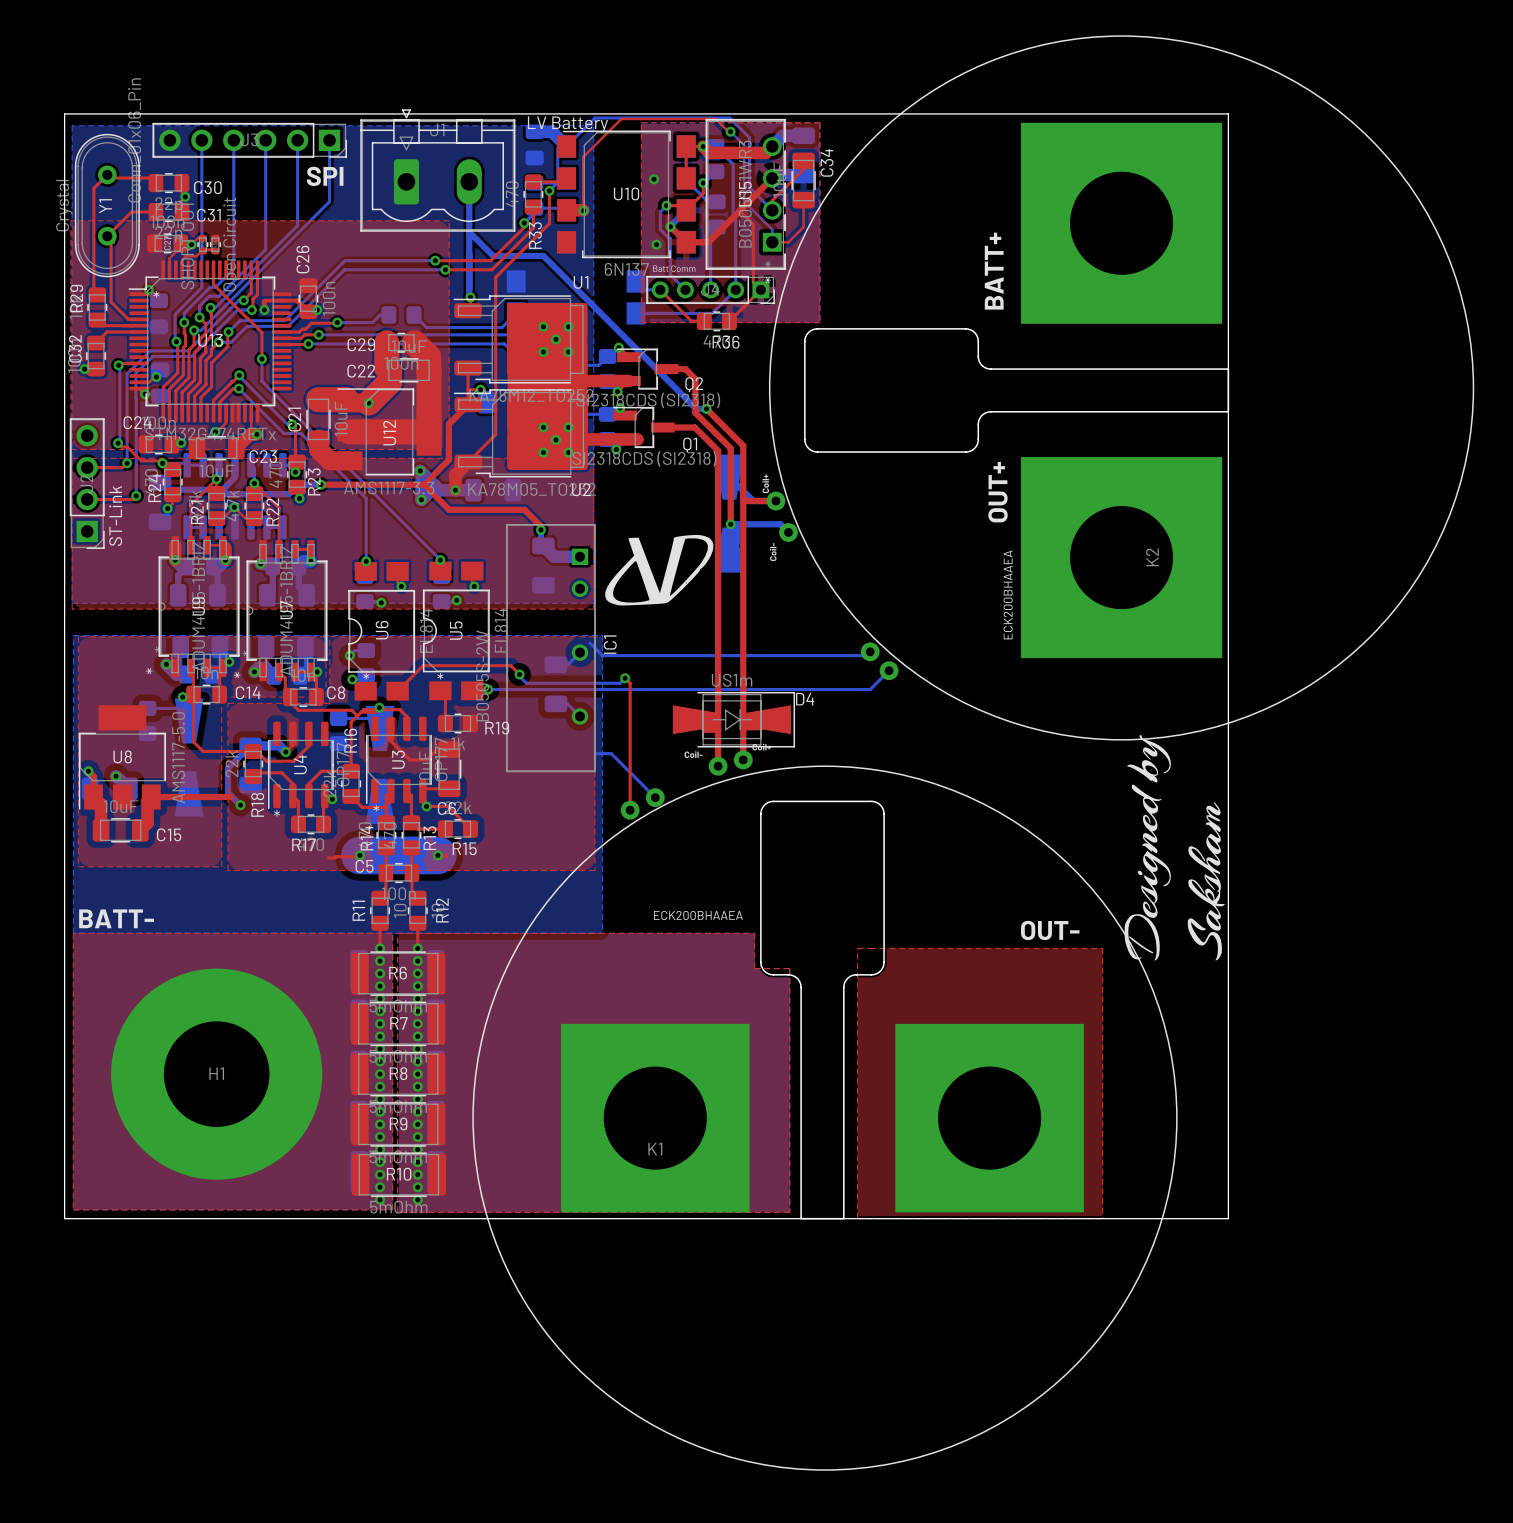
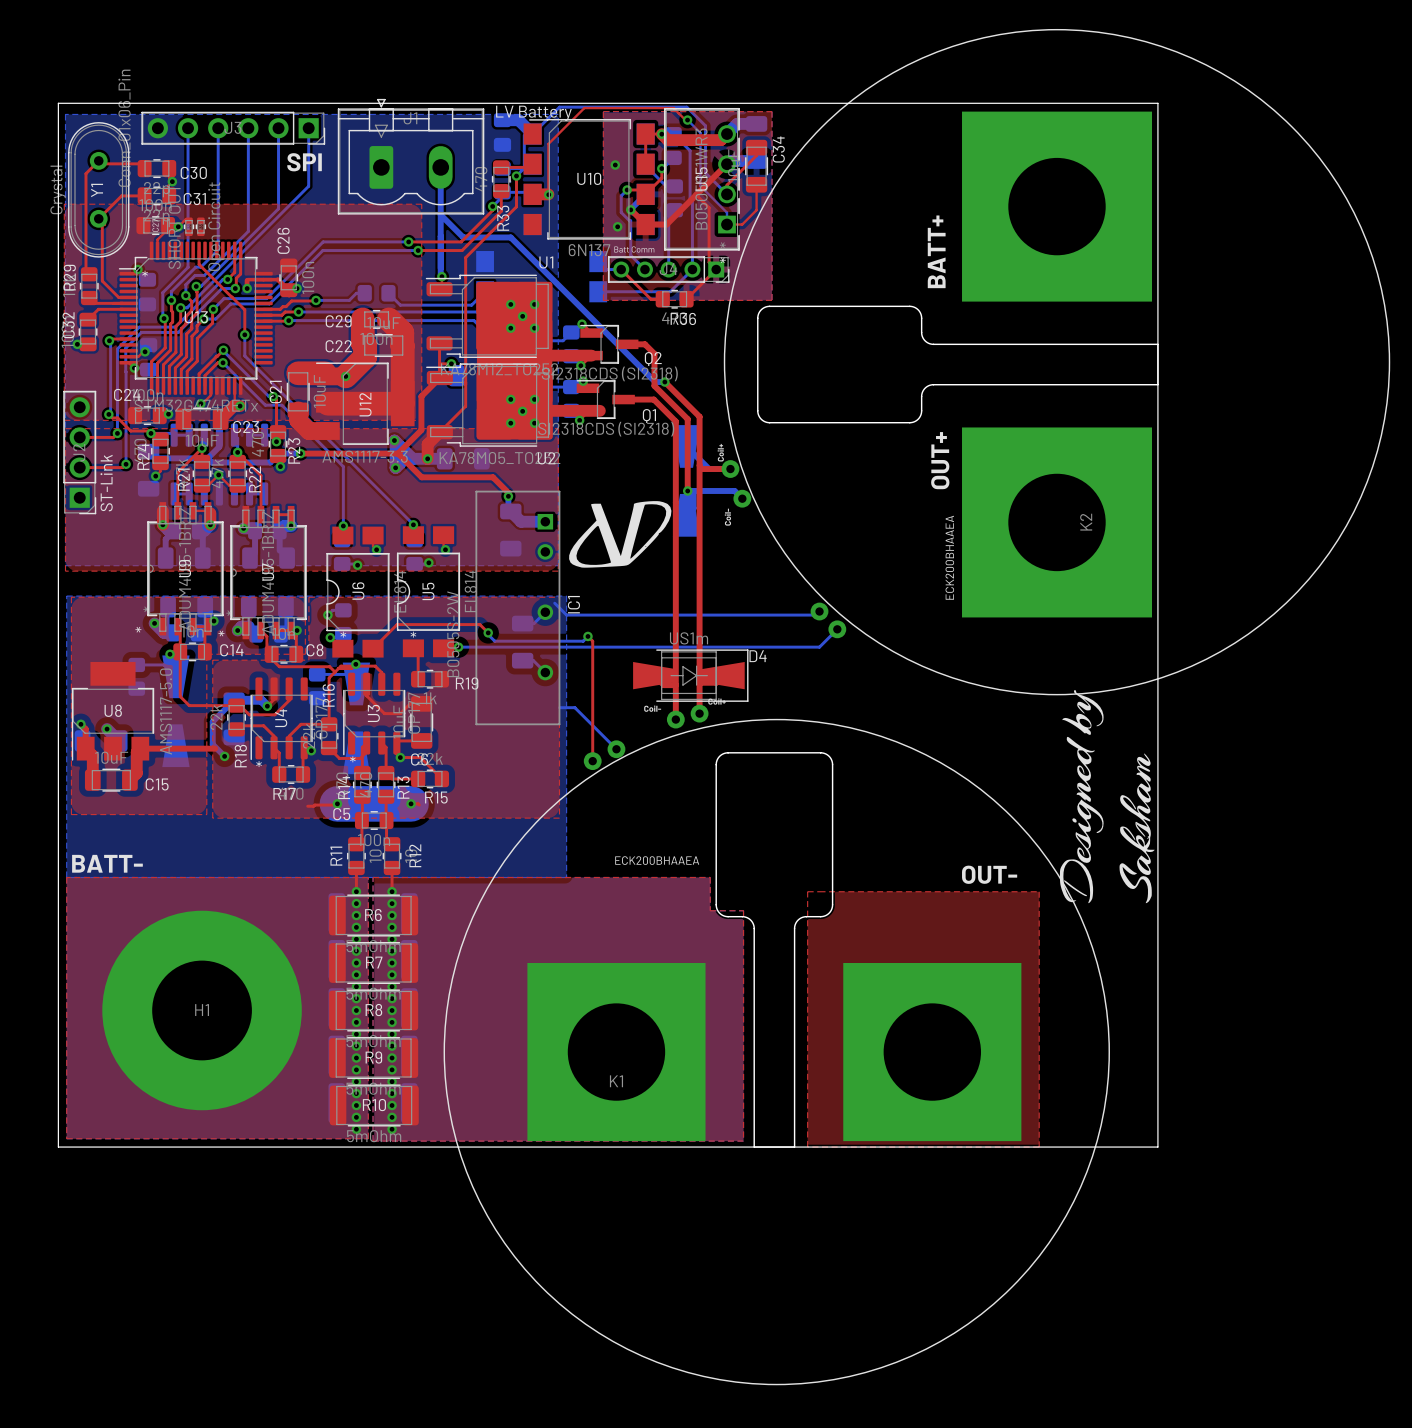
top track: (215, 249) (202, 249) (196, 256) (185, 256) (182, 259) (182, 270) -> none

